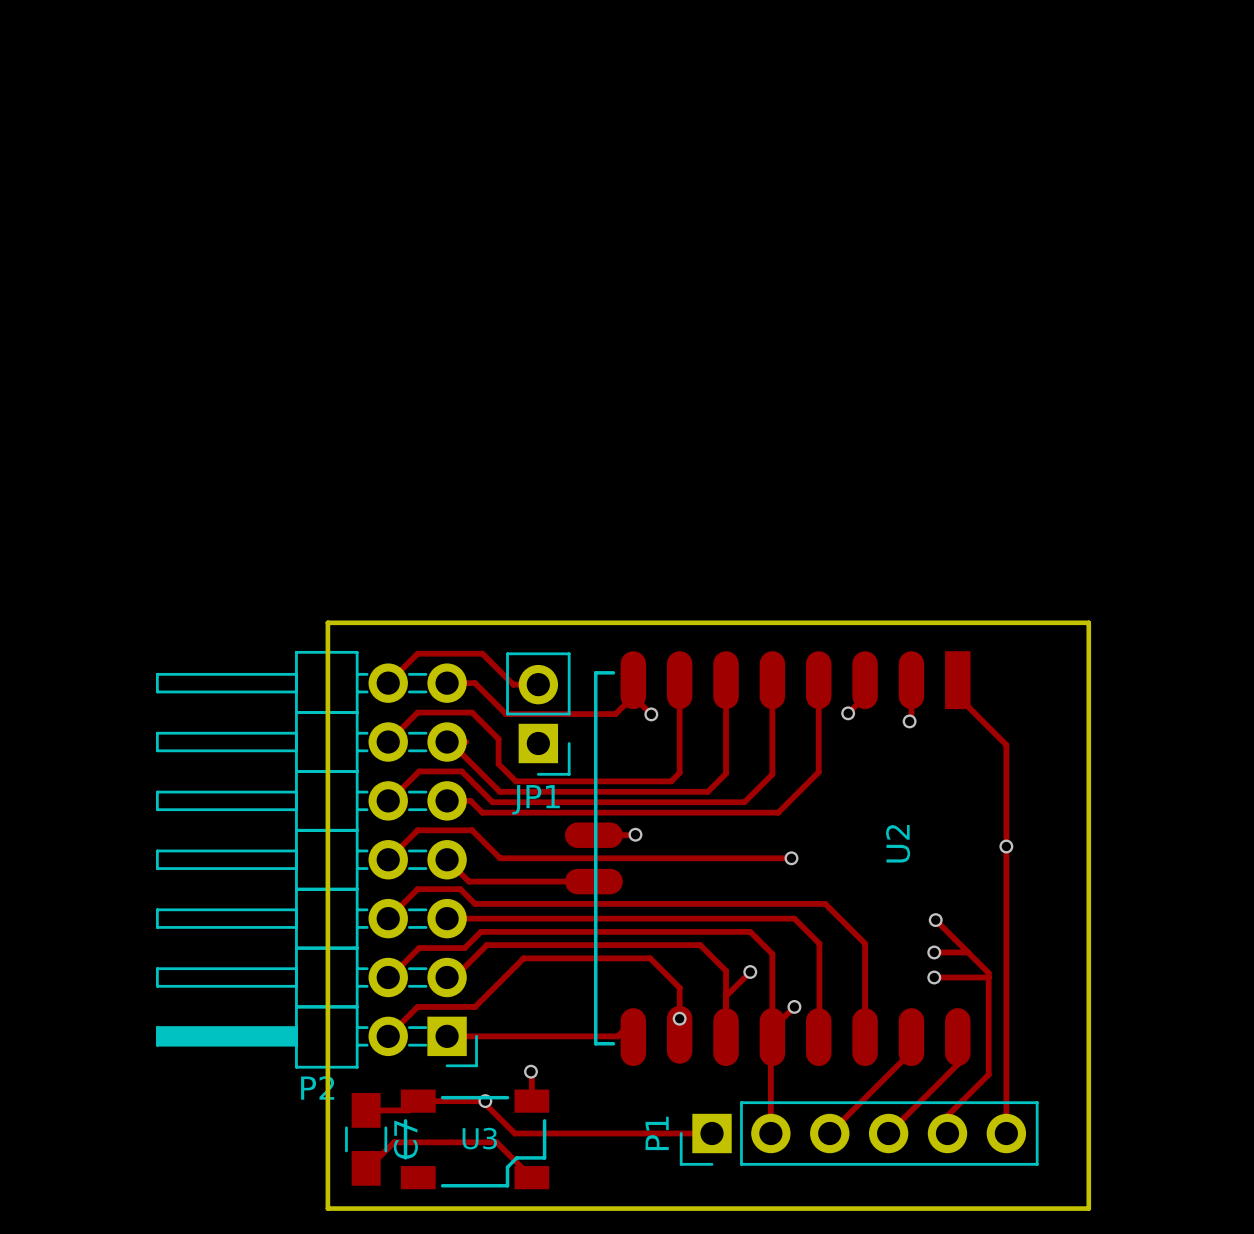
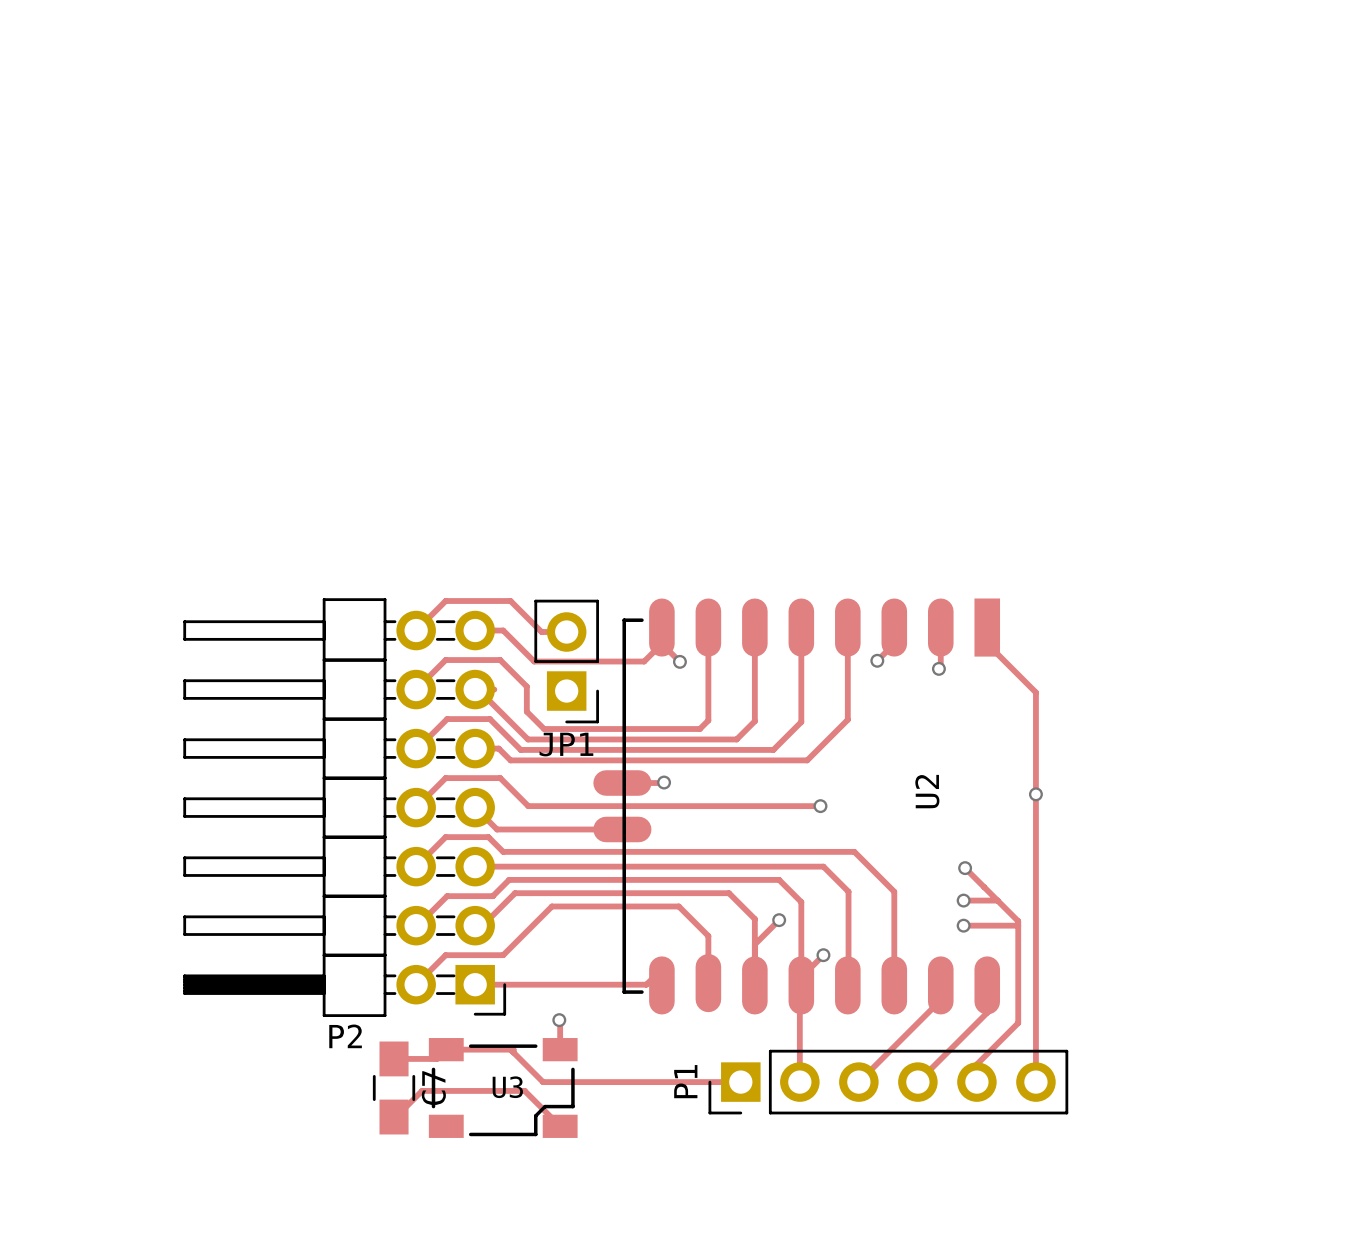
board edge: (327, 622) (1088, 622) (1088, 1208) (327, 1208) (327, 622) -> none
via: (679, 1018) -> none
via: (485, 1101) -> none

